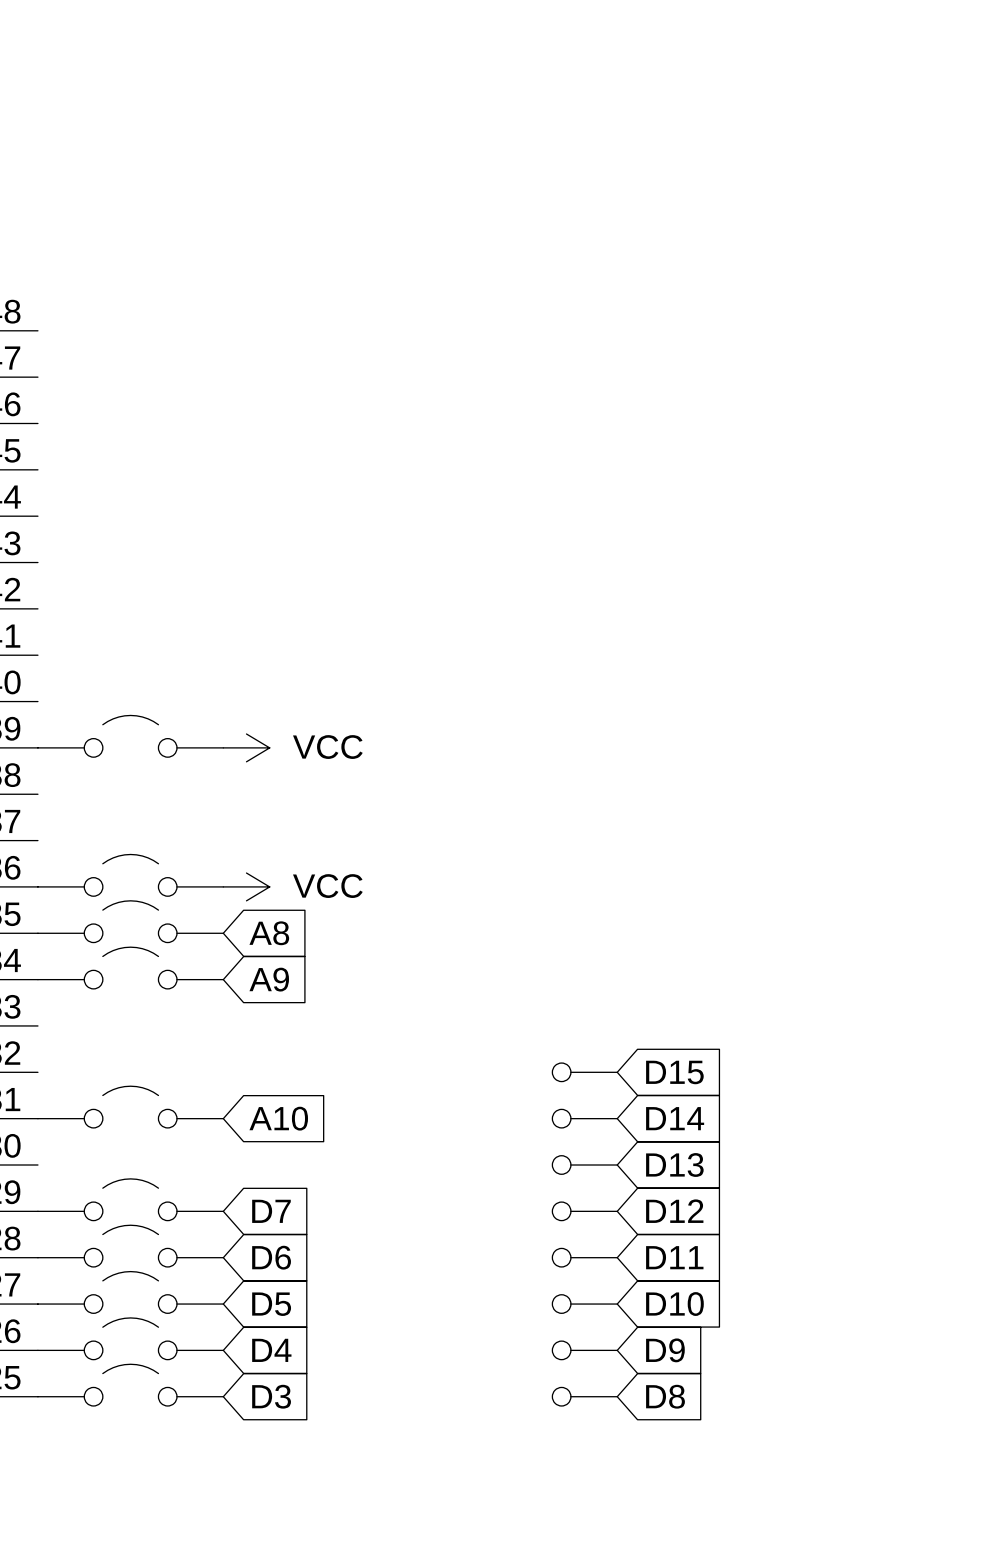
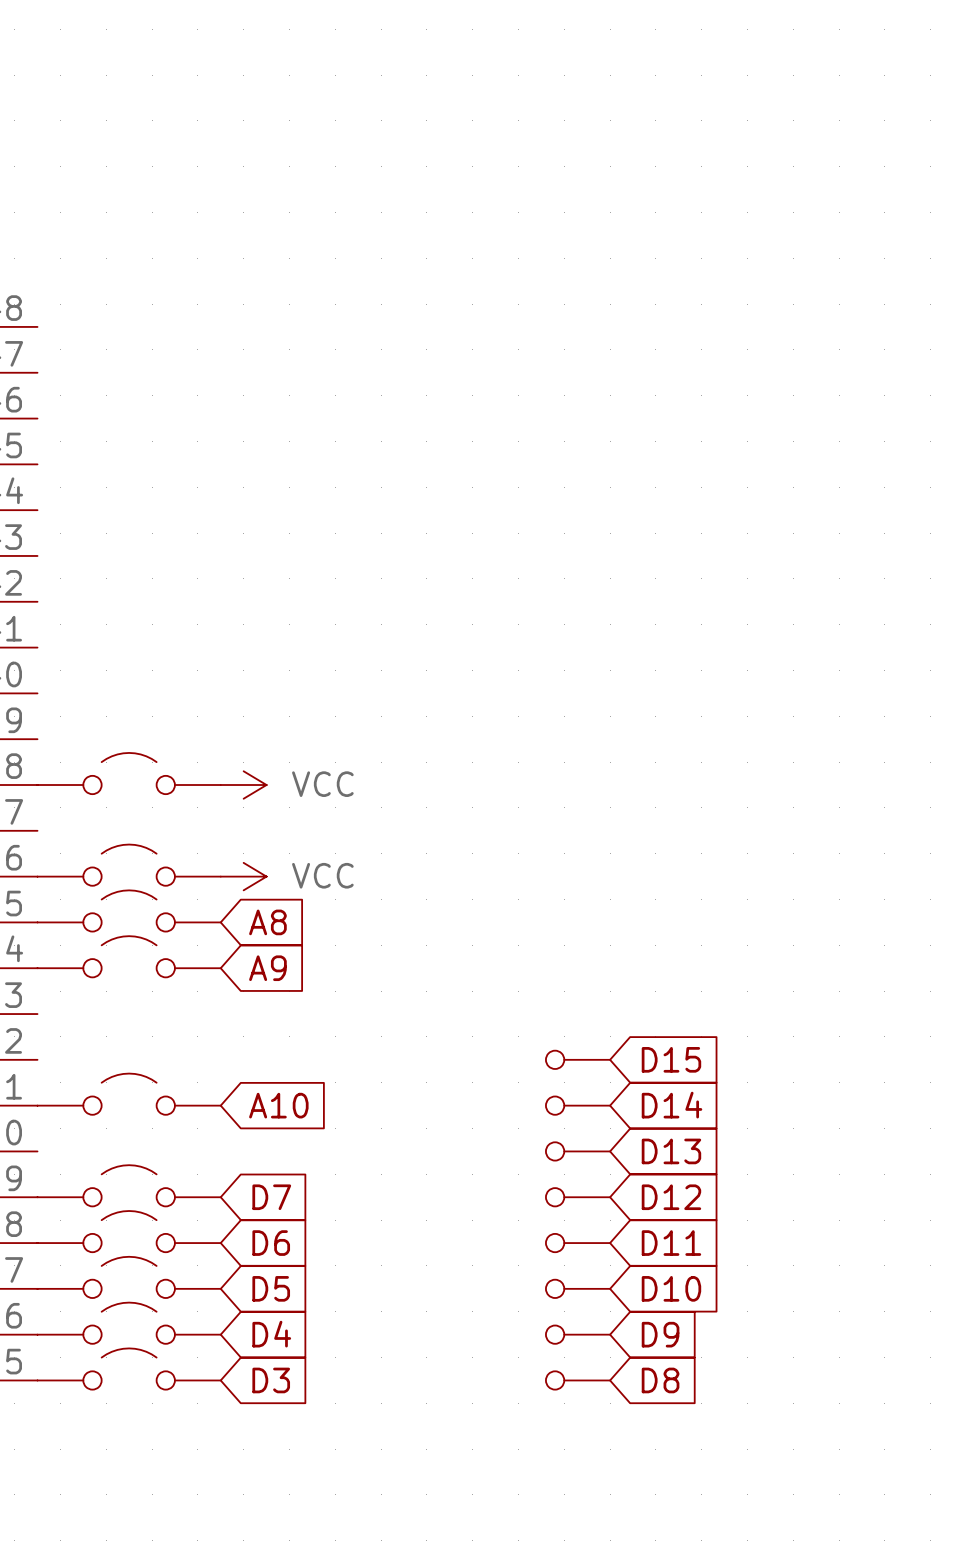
part position: (130, 736) -> (129, 773)
power symbol position: VCC (246, 747) -> VCC (243, 785)

